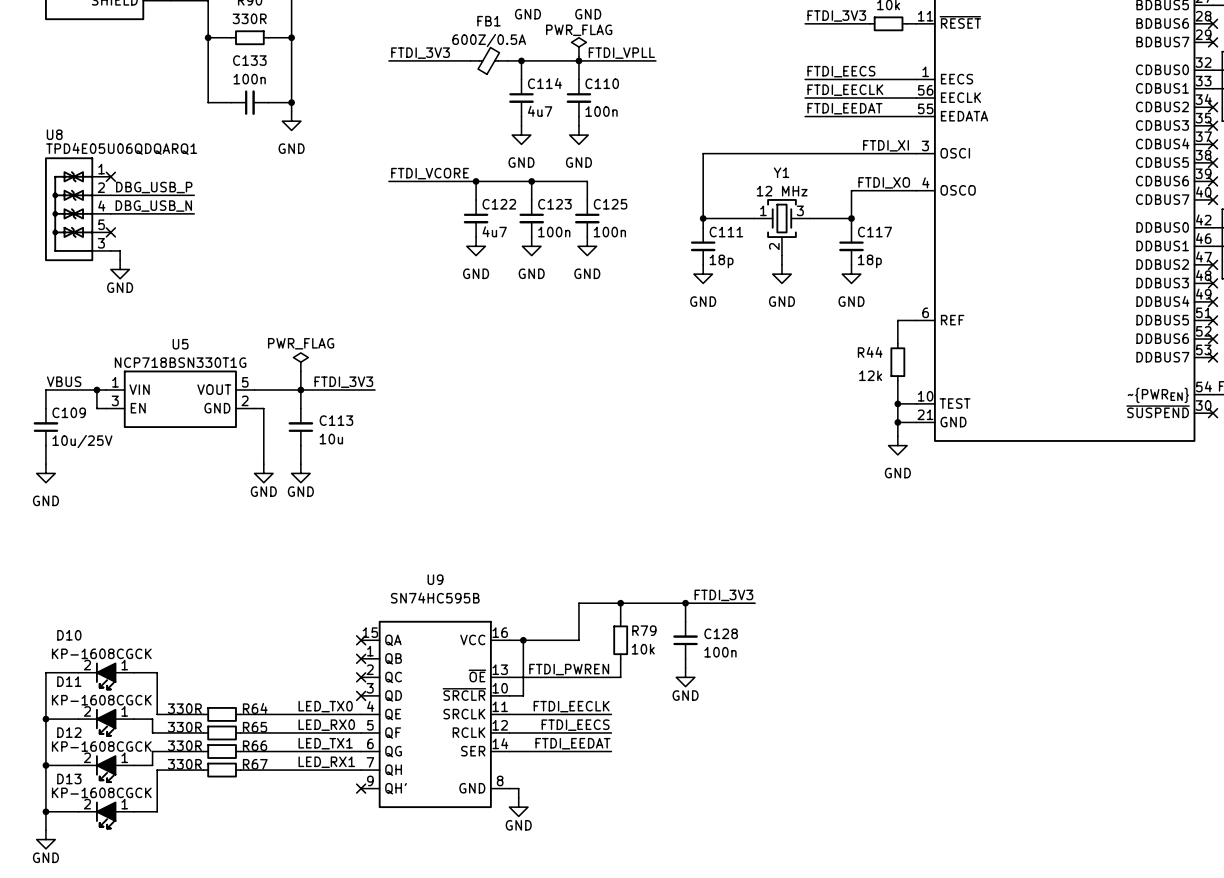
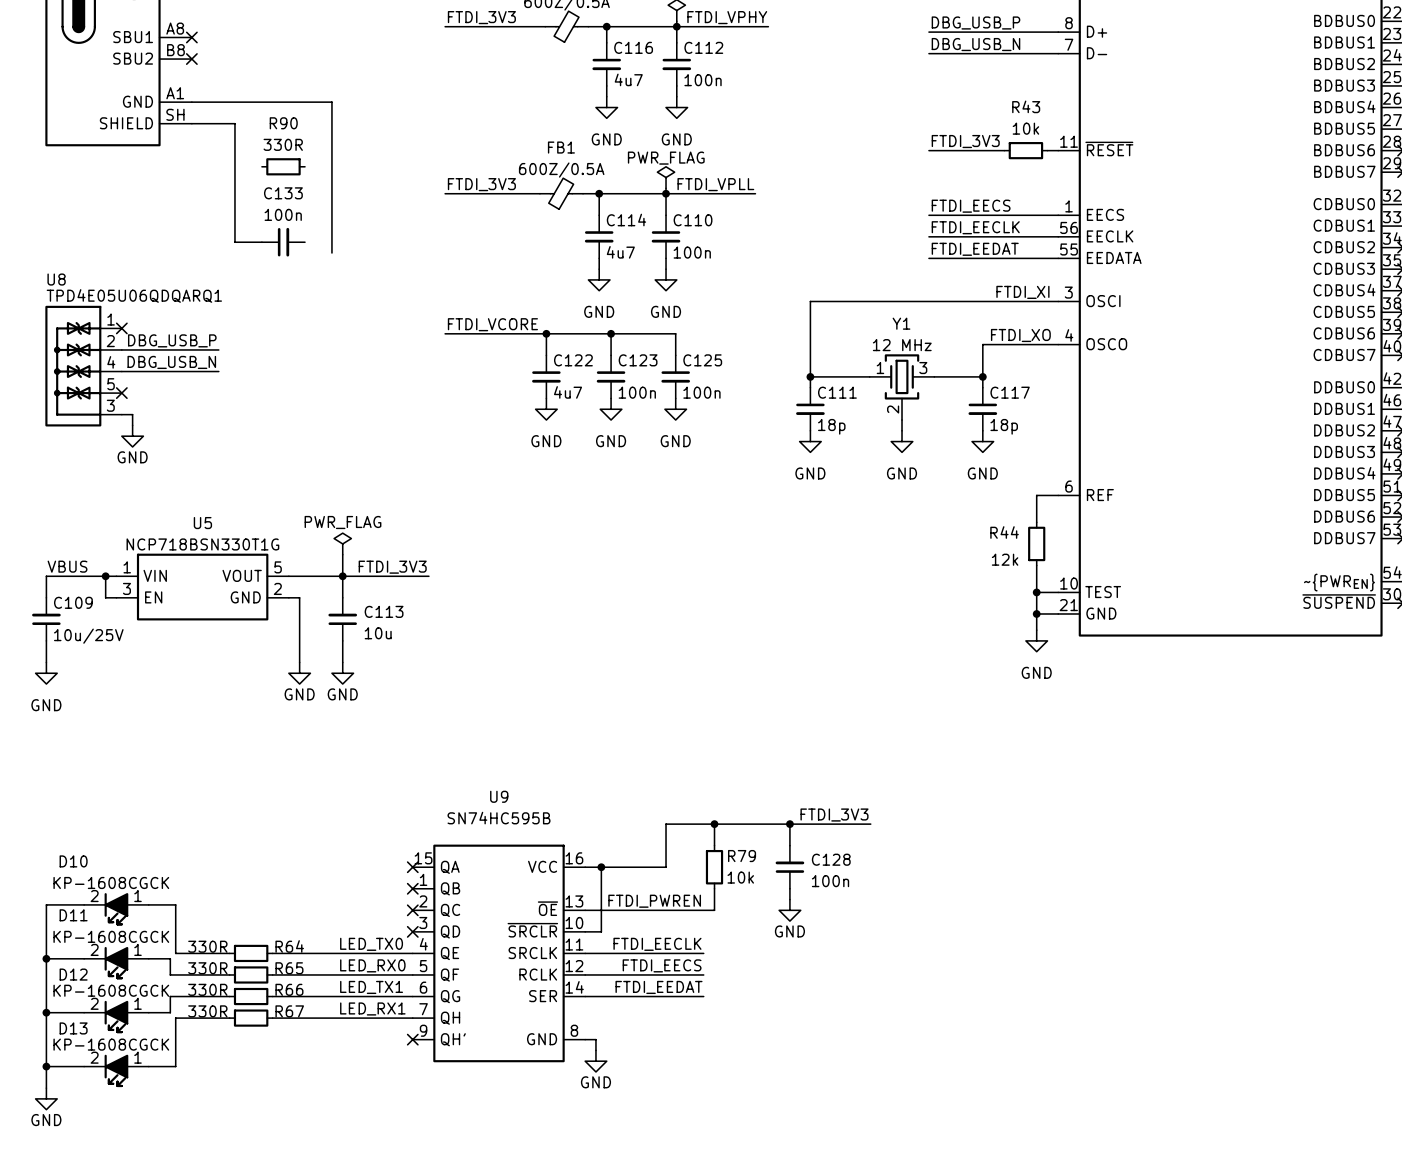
wire: (208, 37) (231, 37) -> none
junction: (208, 37) -> none
wire: (268, 37) (291, 37) -> none
junction: (291, 37) -> none
wire: (268, 102) (291, 102) -> none
junction: (291, 102) -> none
power symbol: GND (291, 121) -> none

